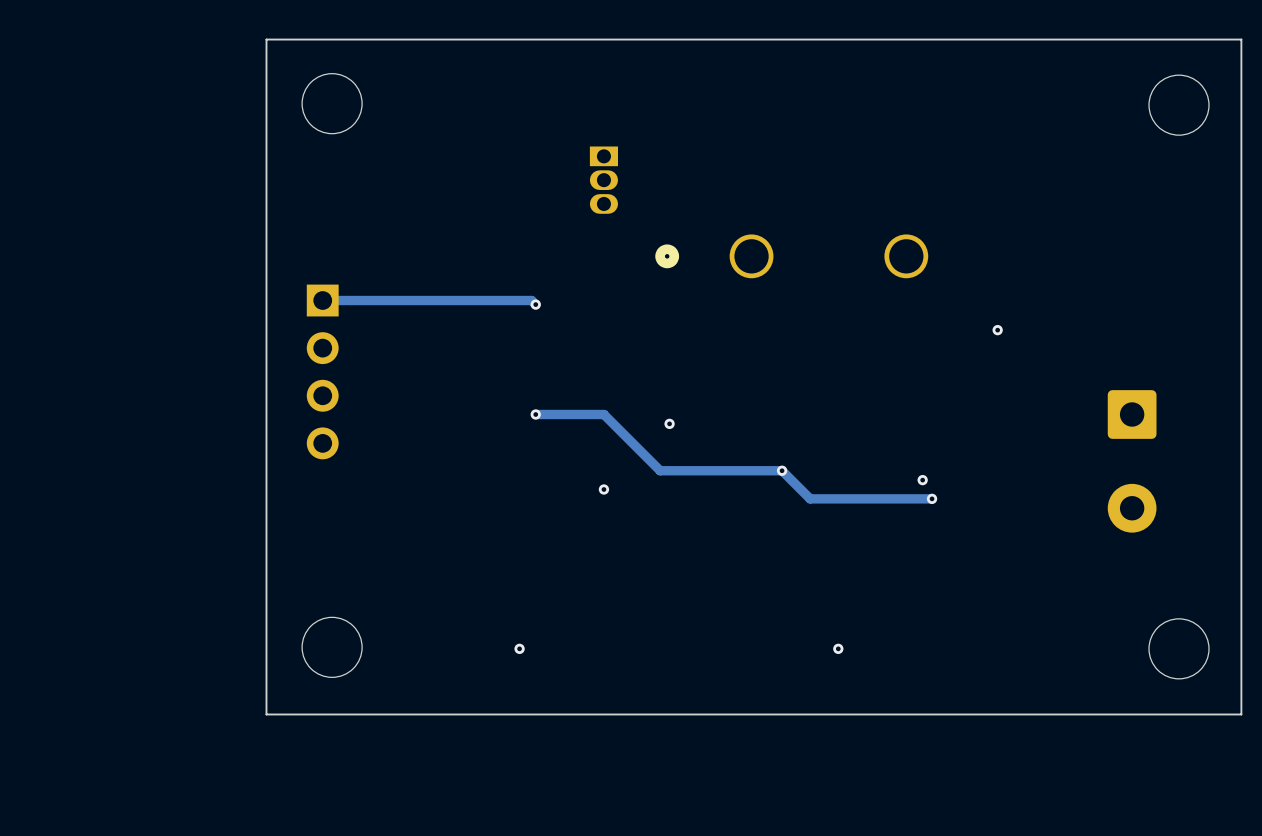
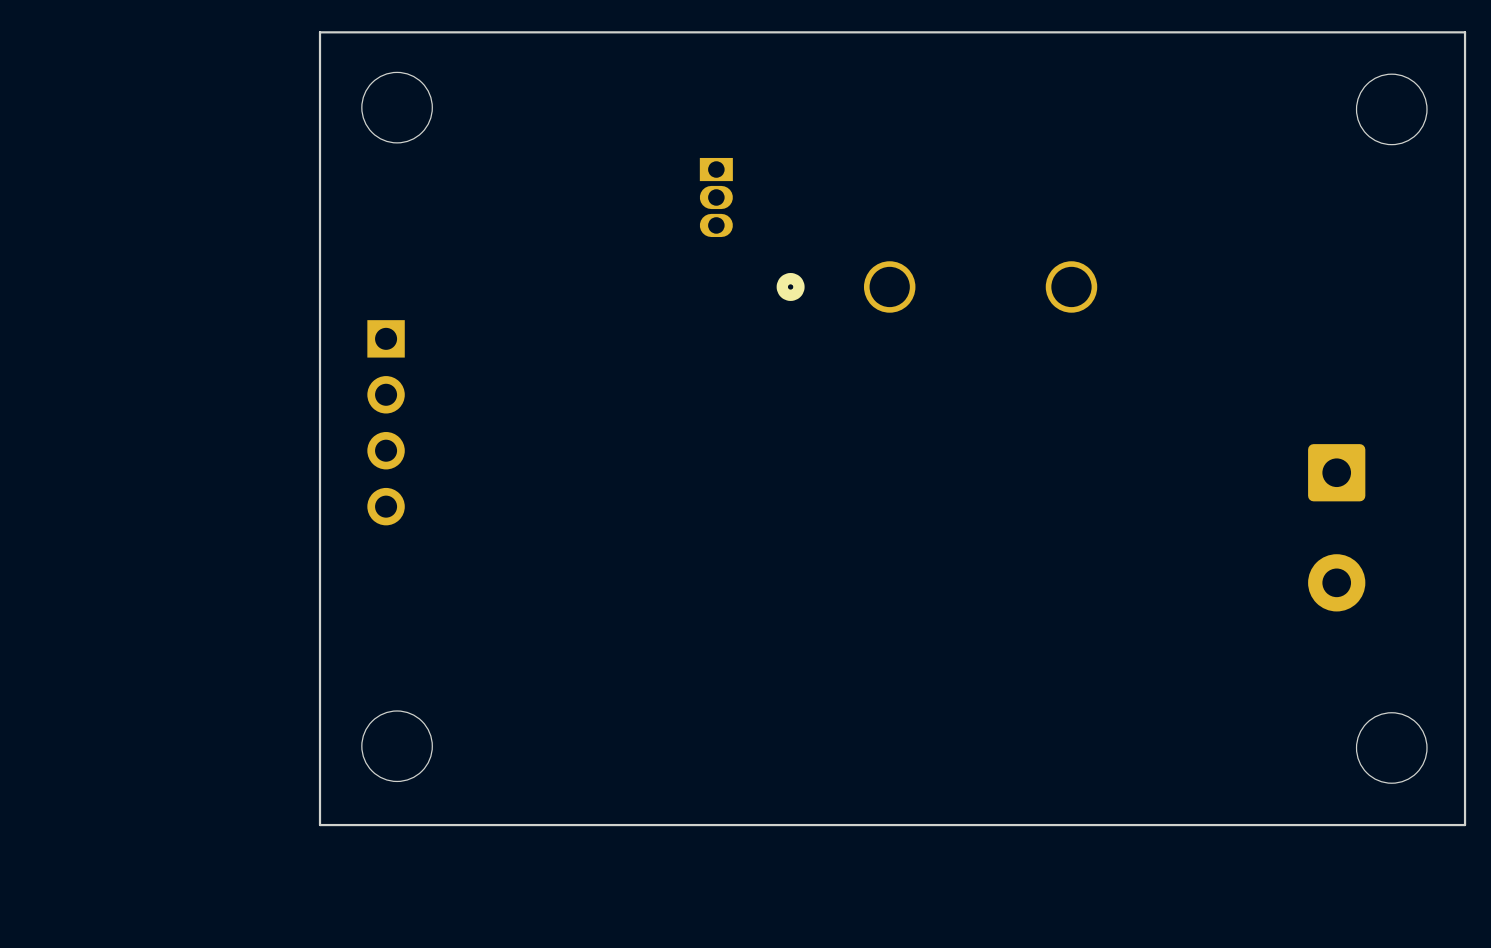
track: (322, 300) (531, 300) (535, 304) -> none
via: (535, 304) -> none
via: (997, 330) -> none
track: (535, 414) (603, 414) (660, 470) (782, 470) (810, 498) (932, 498) -> none
via: (535, 414) -> none
via: (669, 423) -> none
via: (782, 470) -> none
via: (922, 480) -> none
via: (603, 489) -> none
via: (932, 498) -> none
via: (519, 648) -> none
via: (838, 648) -> none

